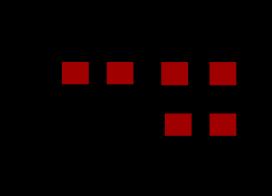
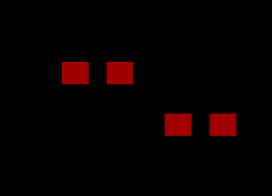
part: (198, 73) -> none

